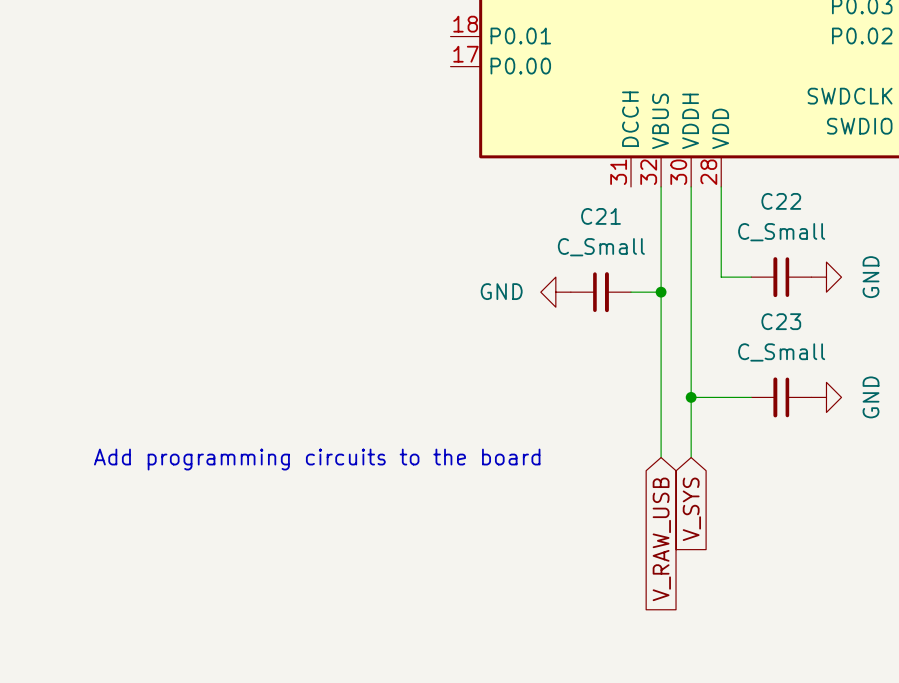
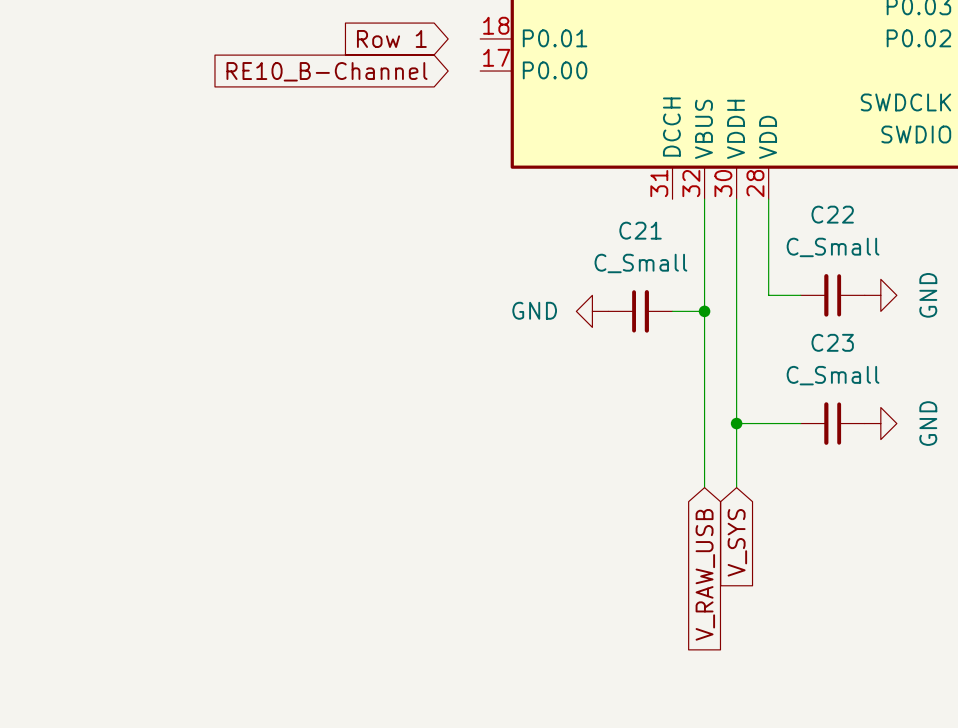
global label: none -> Row 1 (391, 38)
global label: none -> RE10_B-Channel (327, 71)
text: Add programming circuits to the board (317, 459) -> none

